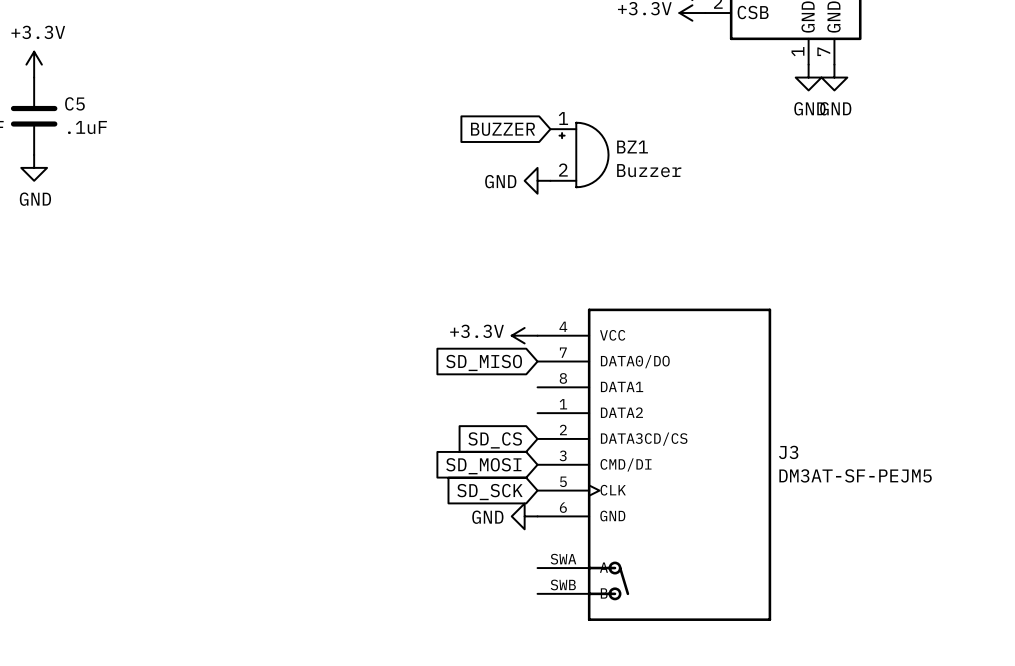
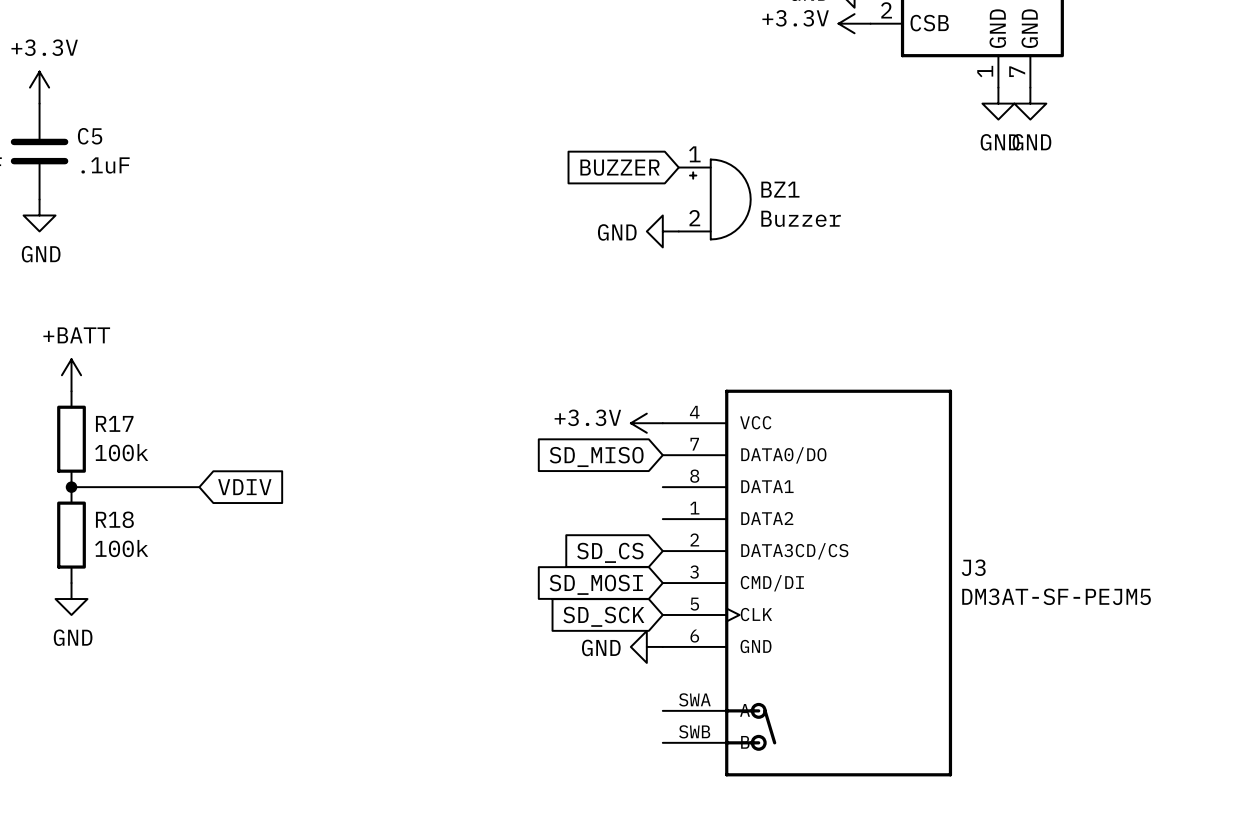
power symbol: none -> +BATT (71, 375)
R17: none -> 100k (71, 439)
wire: none -> (71, 487) (199, 487)
junction: none -> (71, 487)
global label: none -> VDIV (244, 487)
R18: none -> 100k (71, 535)
power symbol: none -> GND (71, 599)

